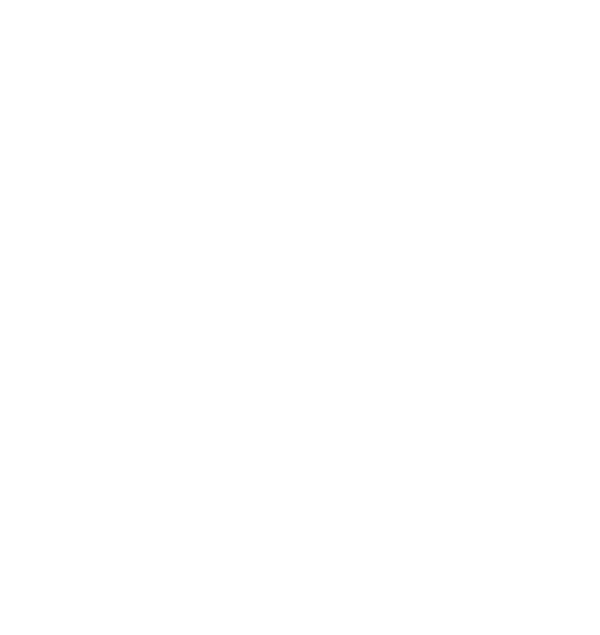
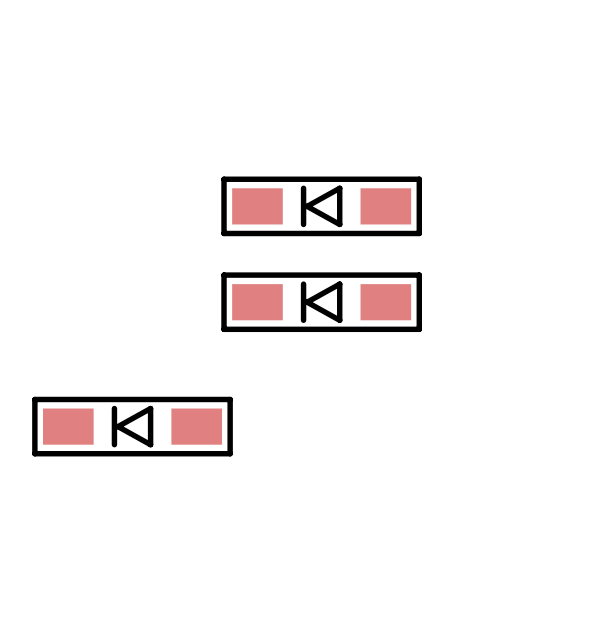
part: none -> (321, 206)
part: none -> (321, 302)
part: none -> (132, 426)

